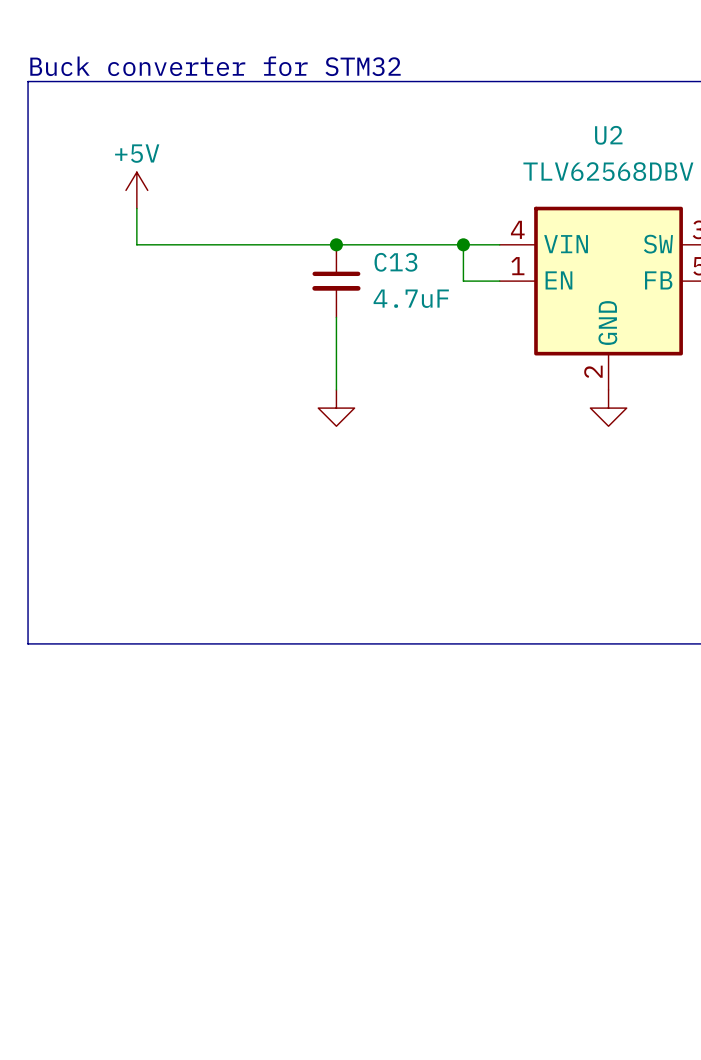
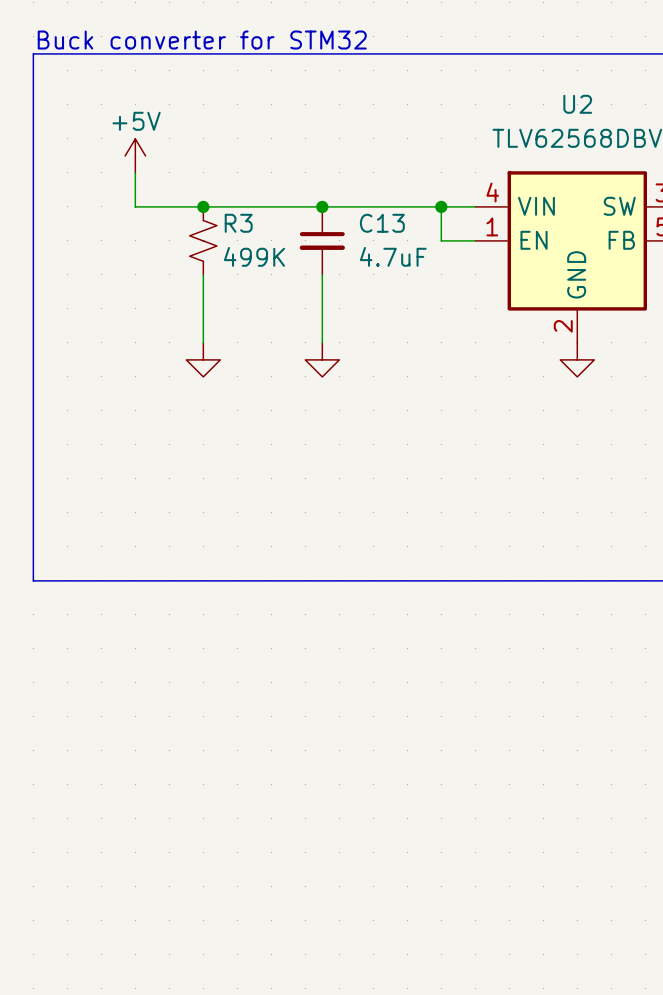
junction: none -> (203, 206)
R3: none -> 499K (203, 240)
wire: none -> (203, 274) (203, 342)
power symbol: none -> (203, 359)

